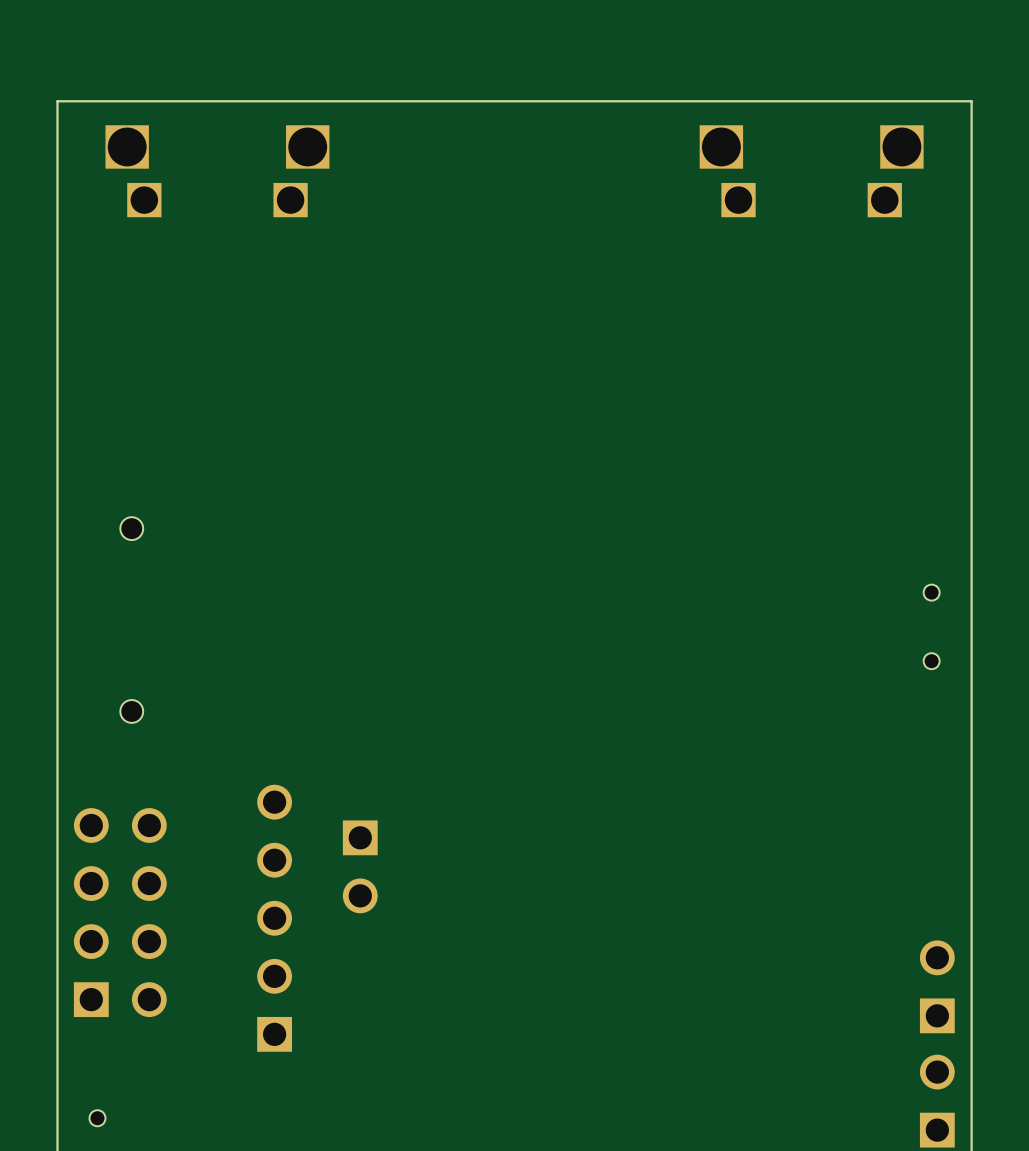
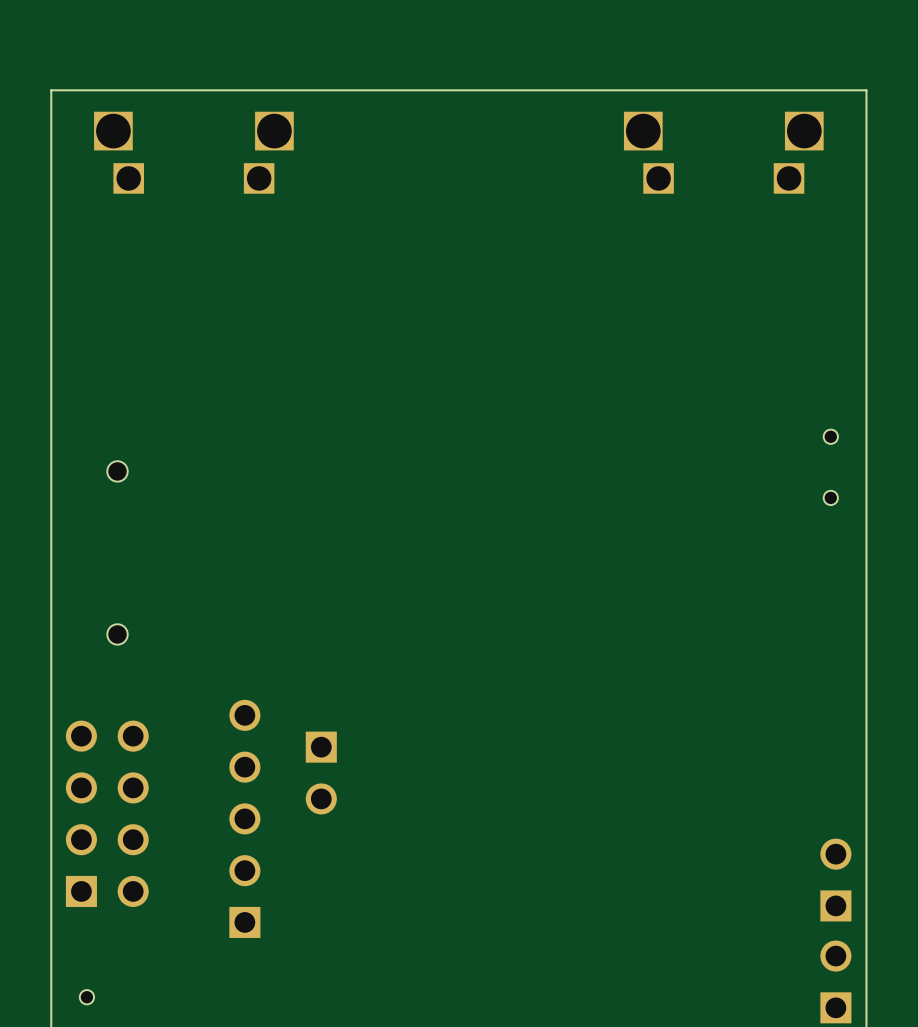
part position: (931, 626) -> (830, 467)

